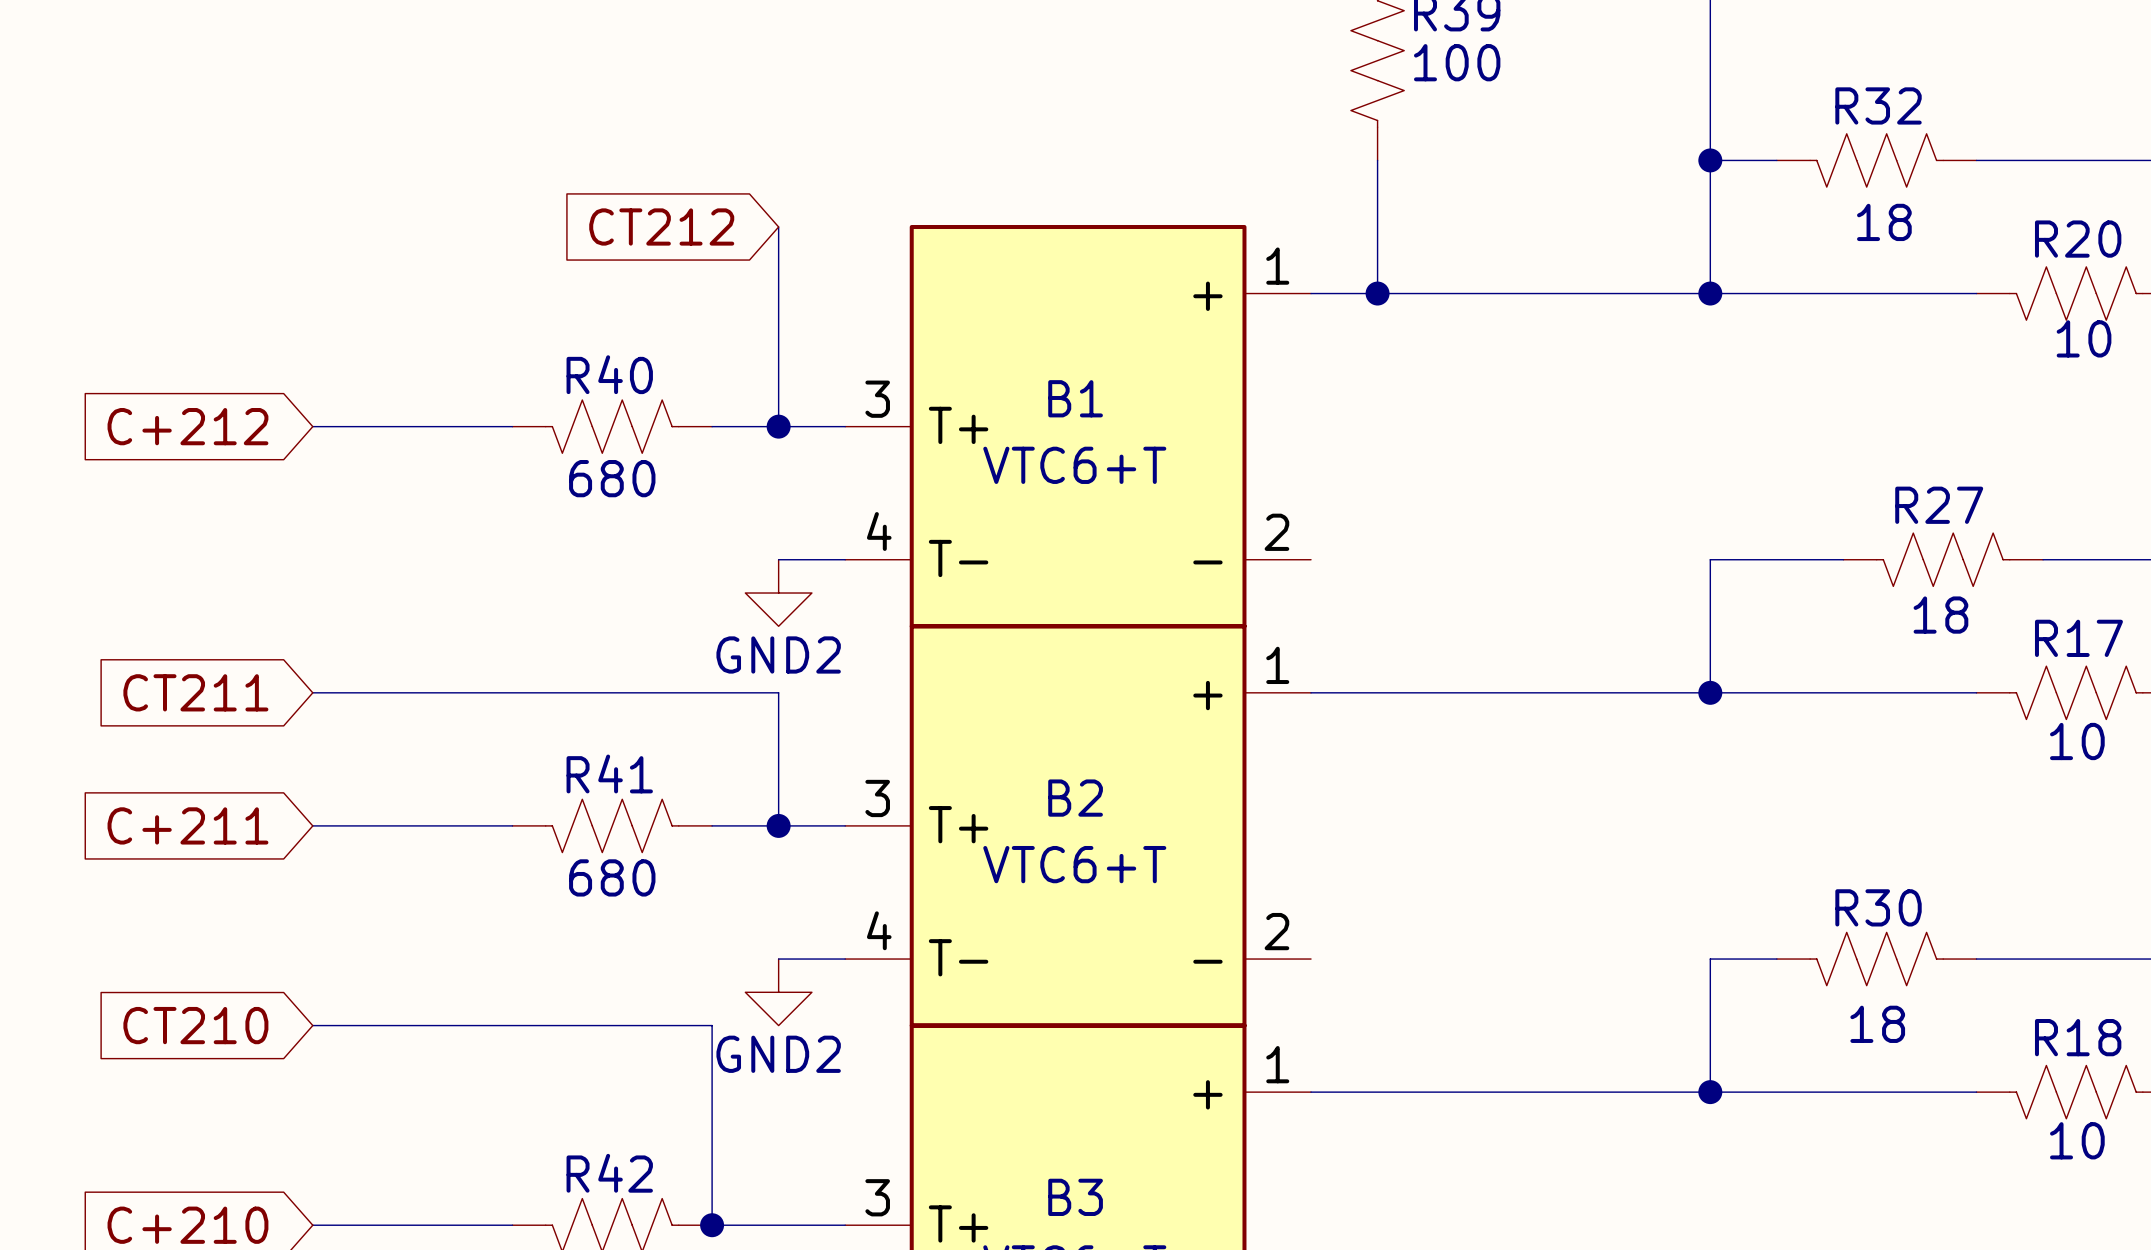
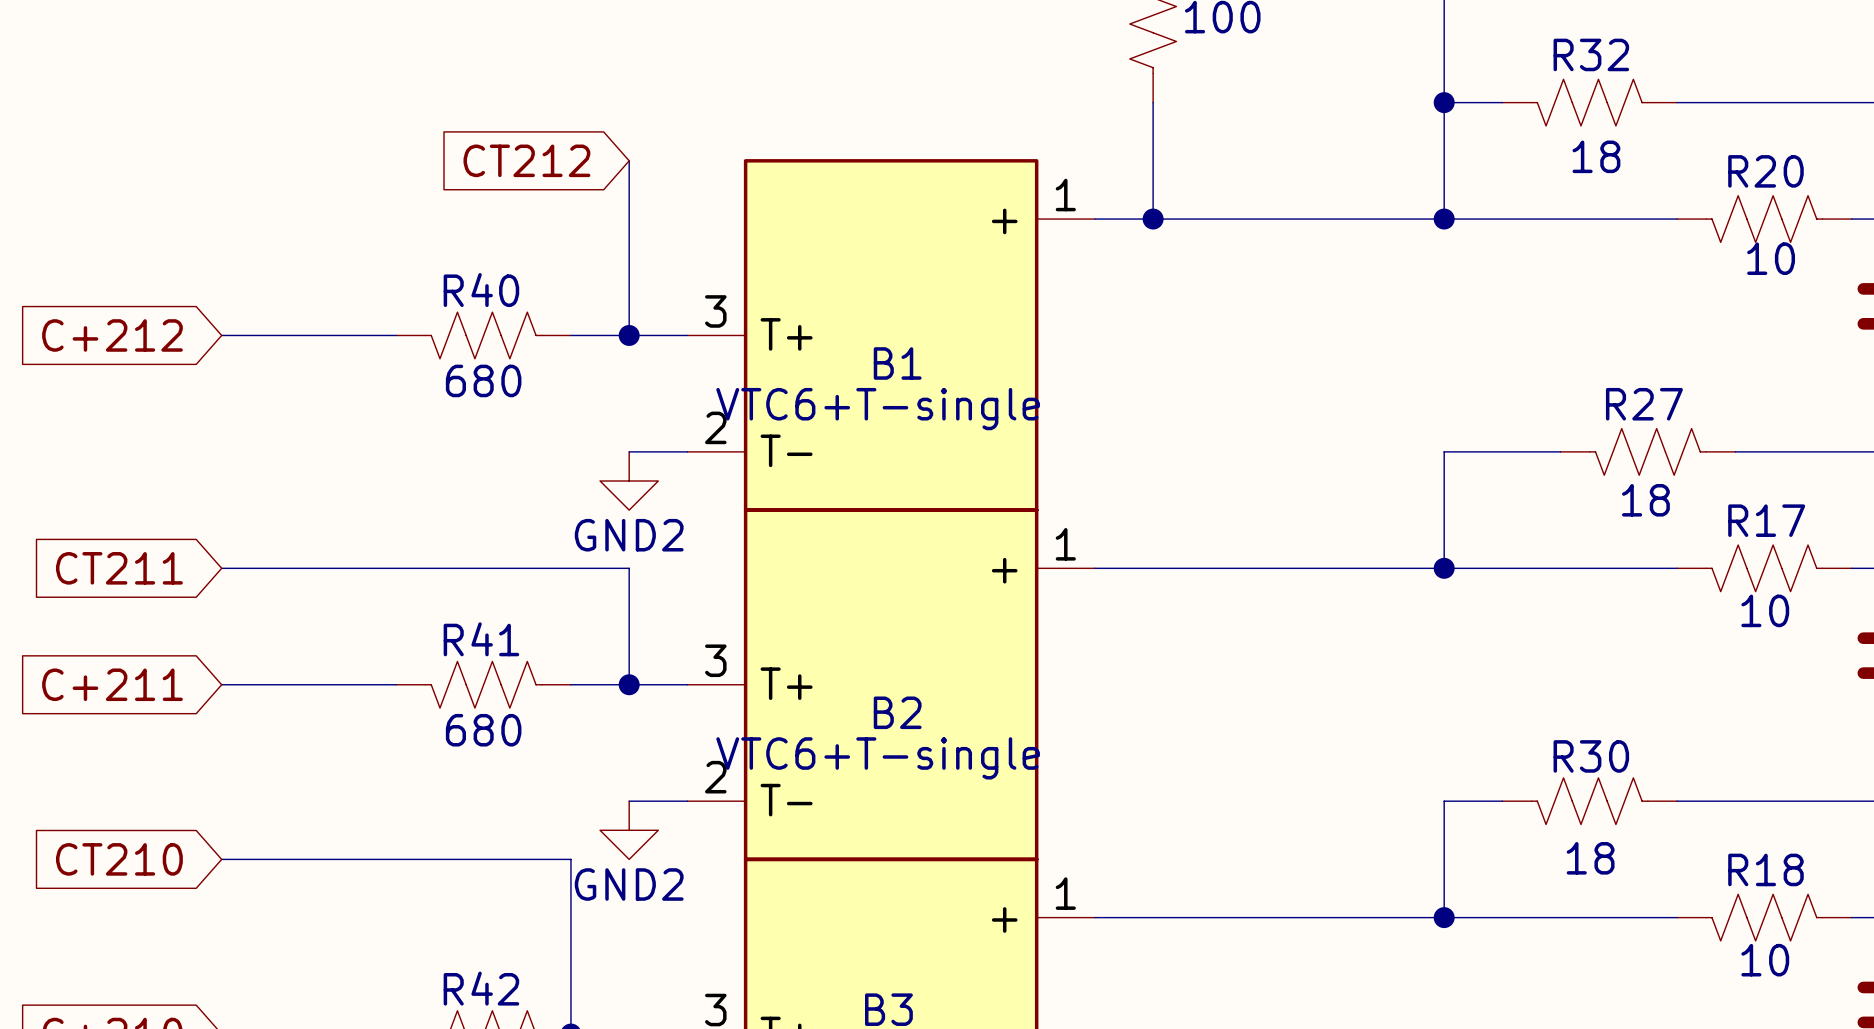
B1 symbol: [845, 224, 1312, 629] -> [687, 159, 1095, 512]
B1 name position: B1 (1075, 398) -> B1 (897, 363)
B1 value: VTC6+T (1074, 465) -> VTC6+T-single (878, 409)
B2 symbol: [845, 624, 1312, 1028] -> [687, 508, 1095, 862]
B2 name position: B2 (1075, 798) -> B2 (897, 712)
B2 value: VTC6+T (1074, 864) -> VTC6+T-single (878, 758)

